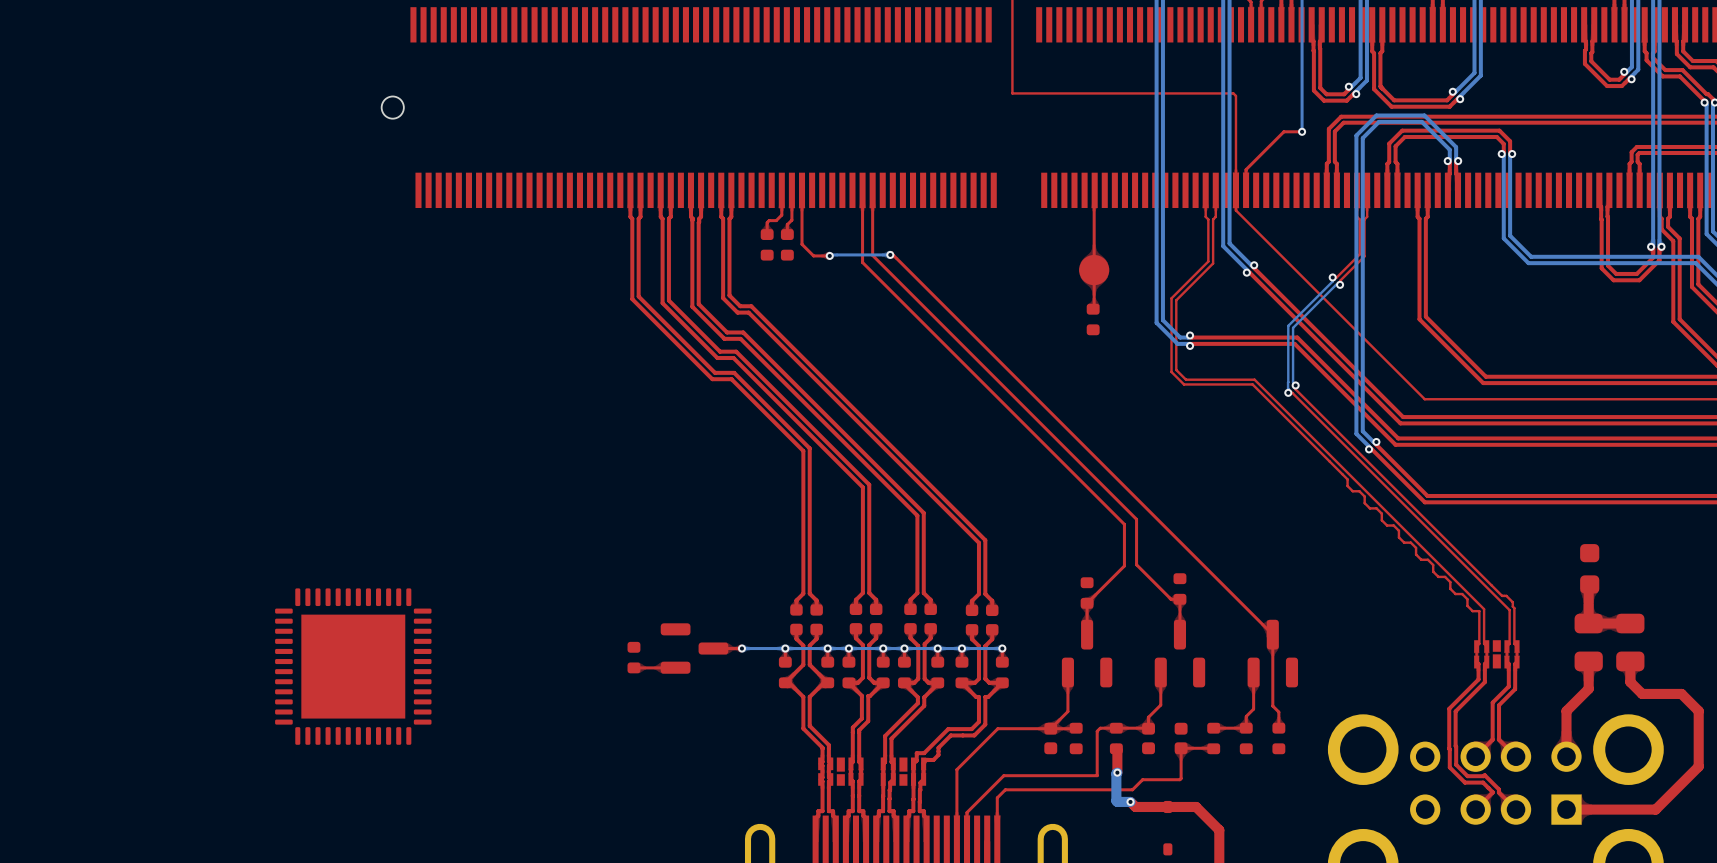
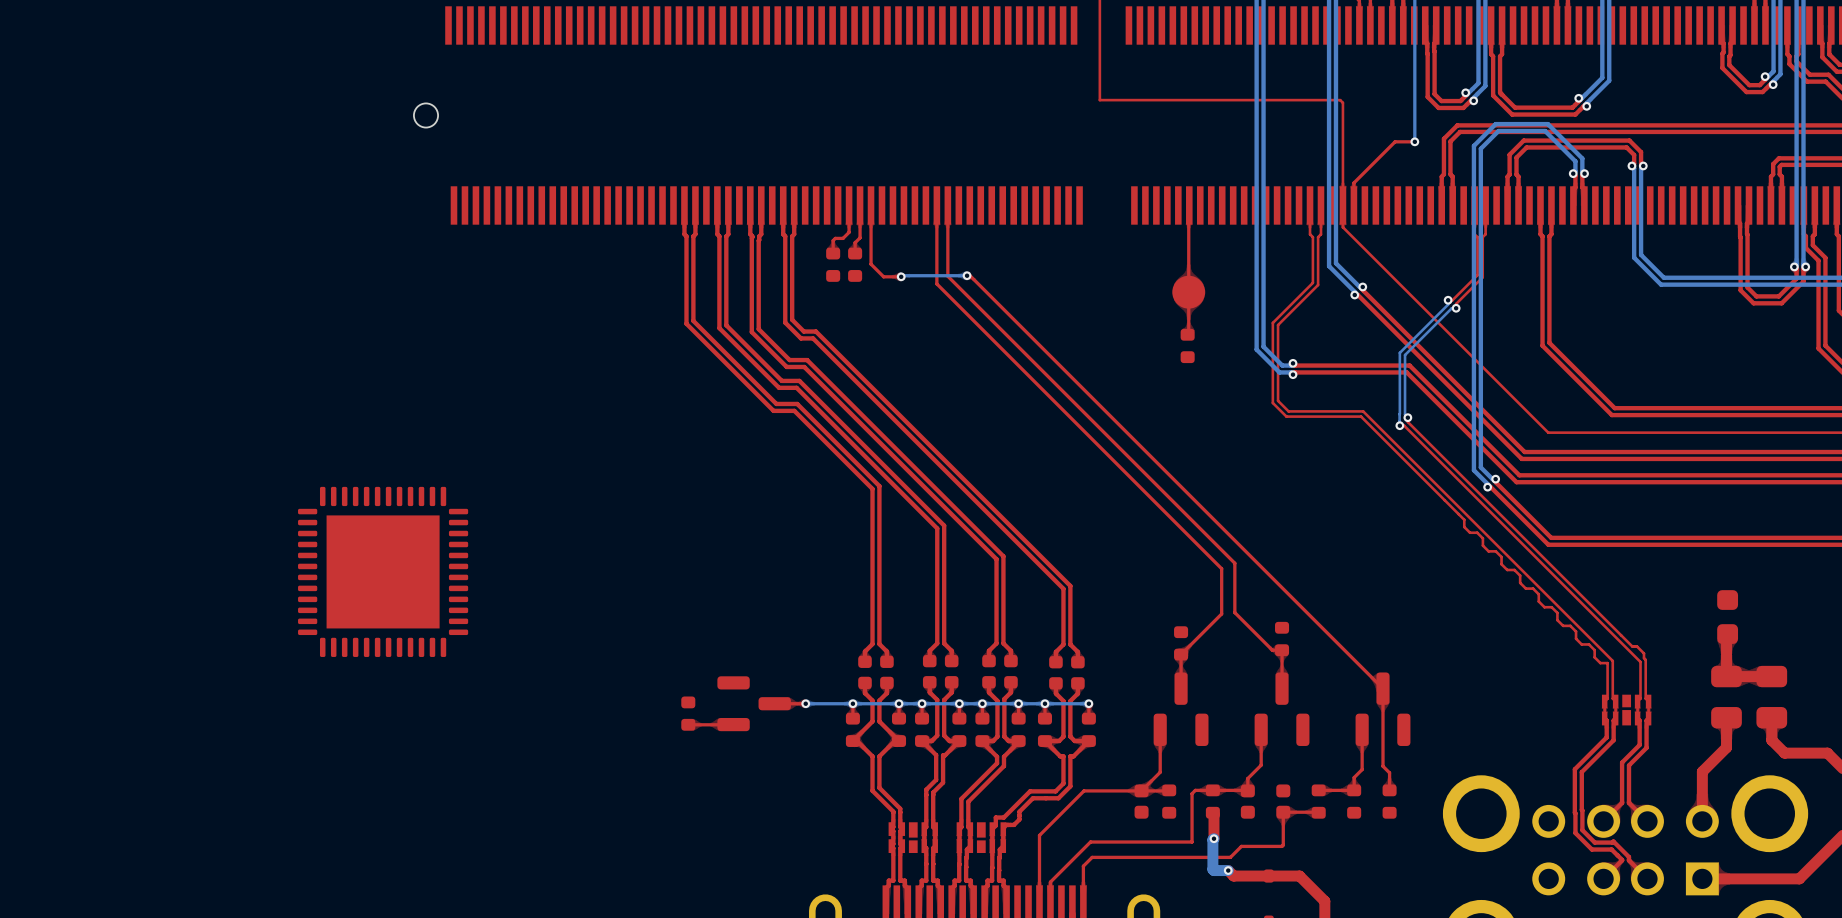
part position: (353, 666) -> (383, 571)

